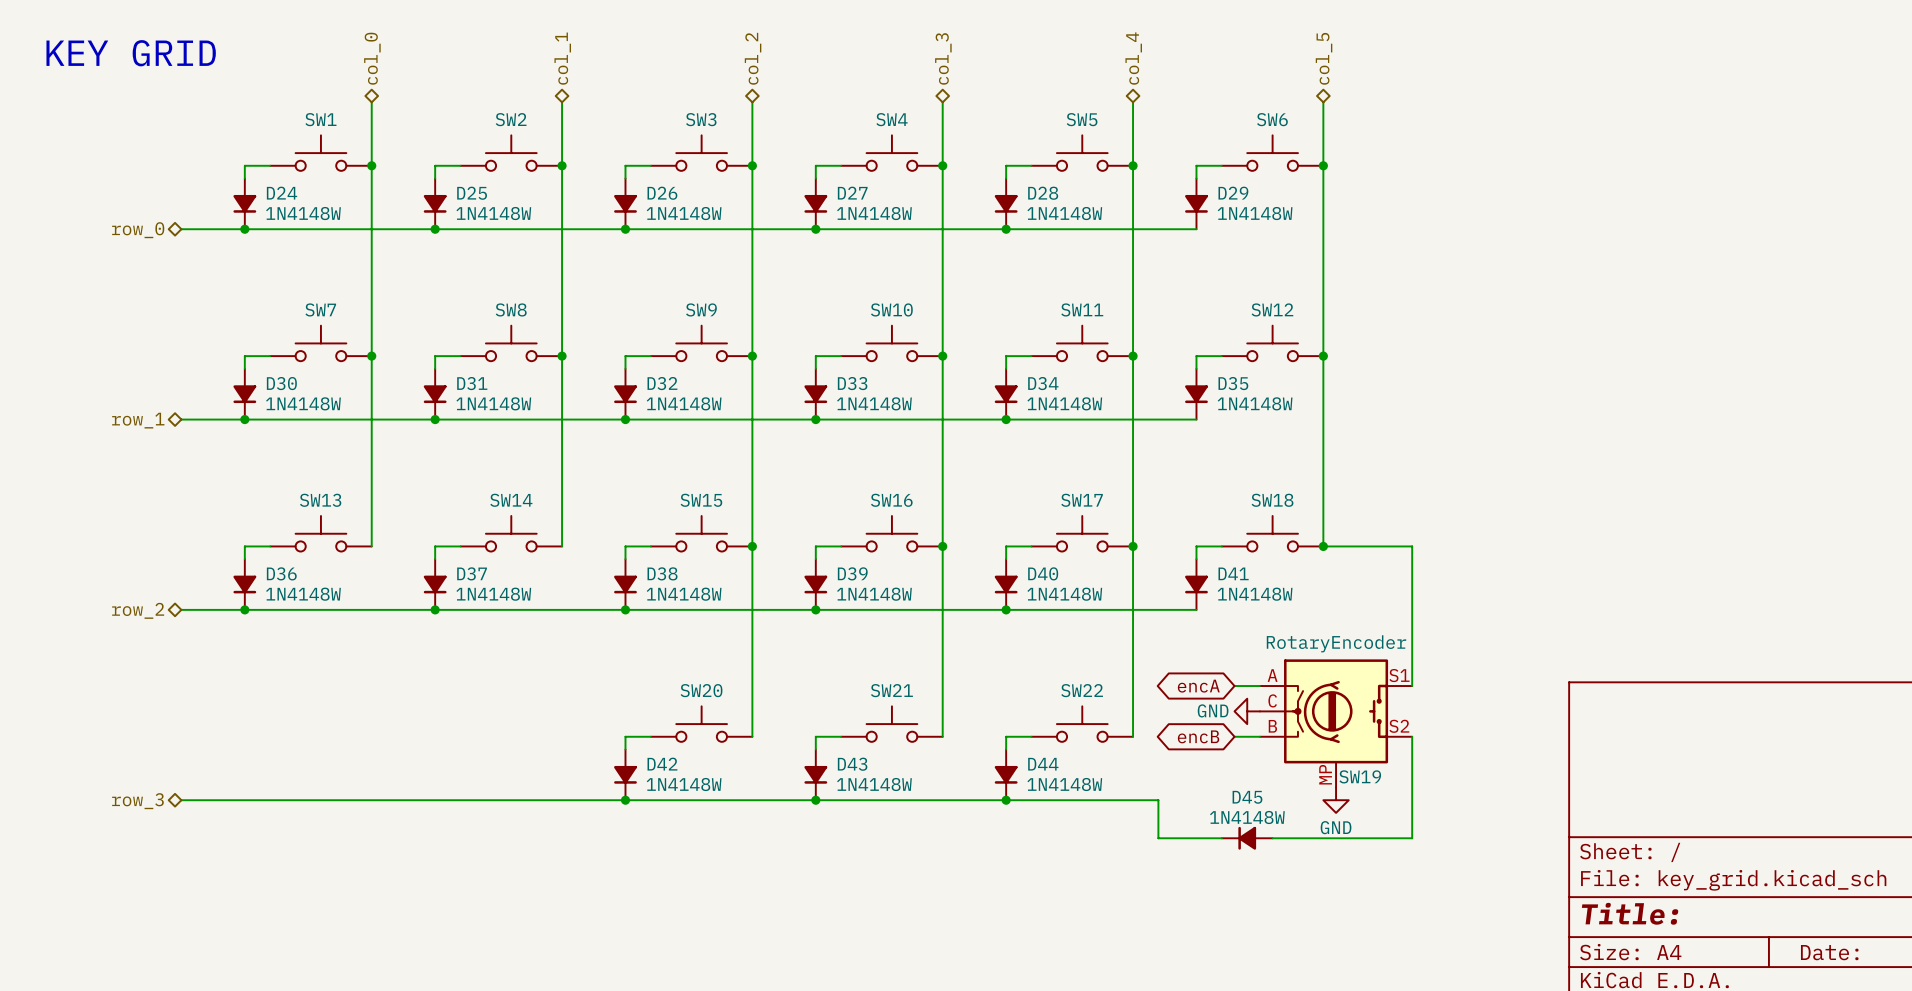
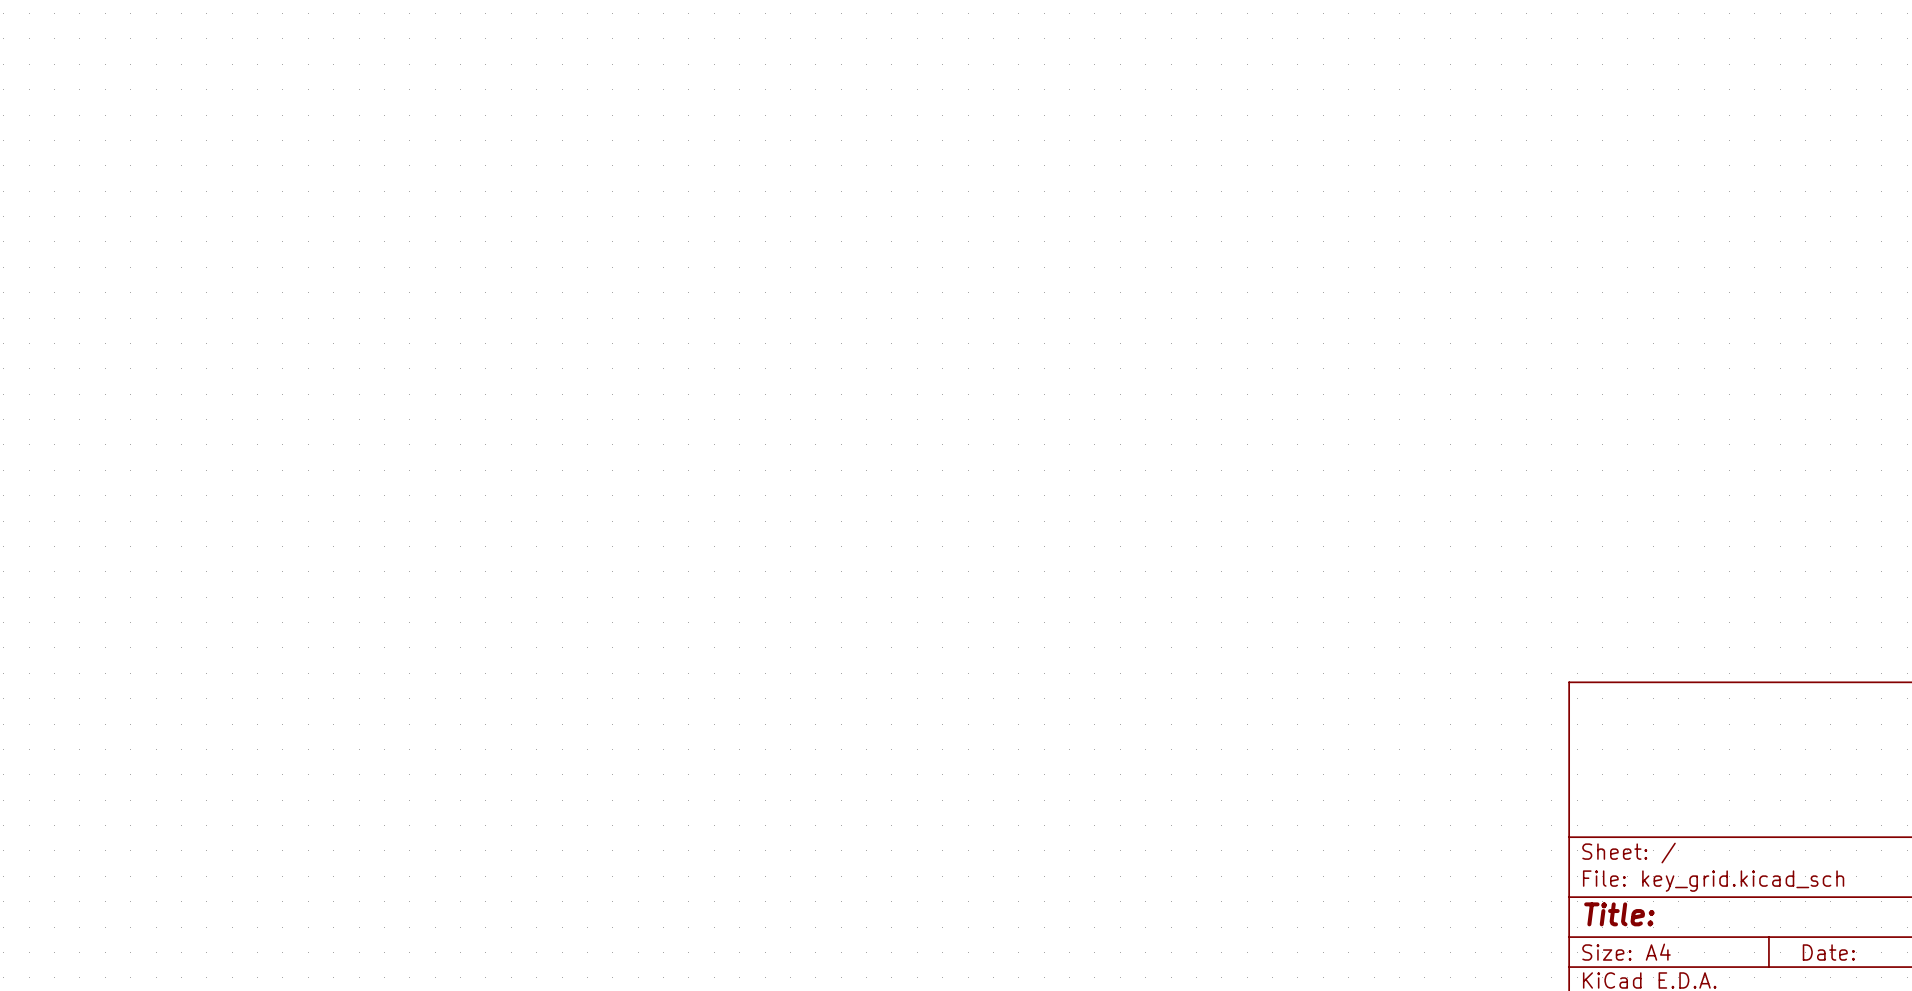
text: KEY GRID (131, 53) -> none
hierarchical label: col_0 (372, 58) -> none
hierarchical label: col_1 (562, 58) -> none
hierarchical label: col_2 (753, 58) -> none
hierarchical label: col_3 (943, 58) -> none
hierarchical label: col_4 (1133, 58) -> none
hierarchical label: col_5 (1324, 58) -> none
wire: (371, 102) (371, 546) -> none
wire: (562, 102) (562, 546) -> none
wire: (752, 102) (752, 736) -> none
wire: (942, 102) (942, 736) -> none
wire: (1133, 102) (1133, 736) -> none
wire: (1323, 102) (1323, 546) (1412, 546) (1412, 686) -> none
SW1: (320, 153) -> none
SW2: (511, 153) -> none
SW3: (701, 153) -> none
SW4: (891, 153) -> none
SW5: (1082, 153) -> none
SW6: (1272, 153) -> none
wire: (270, 165) (244, 165) (244, 178) -> none
junction: (371, 165) -> none
wire: (460, 165) (435, 165) (435, 178) -> none
junction: (562, 165) -> none
wire: (650, 165) (625, 165) (625, 178) -> none
junction: (752, 165) -> none
wire: (841, 165) (815, 165) (815, 178) -> none
junction: (942, 165) -> none
wire: (1031, 165) (1006, 165) (1006, 178) -> none
junction: (1133, 165) -> none
wire: (1221, 165) (1196, 165) (1196, 178) -> none
junction: (1323, 165) -> none
D24: 1N4148W (244, 203) -> none
D25: 1N4148W (435, 203) -> none
D26: 1N4148W (625, 203) -> none
D27: 1N4148W (815, 203) -> none
D28: 1N4148W (1006, 203) -> none
D29: 1N4148W (1196, 203) -> none
wire: (181, 229) (1196, 229) -> none
junction: (244, 229) -> none
junction: (435, 229) -> none
junction: (625, 229) -> none
junction: (815, 229) -> none
junction: (1006, 229) -> none
hierarchical label: row_0 (138, 230) -> none
SW7: (320, 343) -> none
SW8: (511, 343) -> none
SW9: (701, 343) -> none
SW10: (891, 343) -> none
SW11: (1082, 343) -> none
SW12: (1272, 343) -> none
wire: (270, 356) (244, 356) (244, 368) -> none
junction: (371, 356) -> none
wire: (460, 356) (435, 356) (435, 368) -> none
junction: (562, 356) -> none
wire: (650, 356) (625, 356) (625, 368) -> none
junction: (752, 356) -> none
wire: (841, 356) (815, 356) (815, 368) -> none
junction: (942, 356) -> none
wire: (1031, 356) (1006, 356) (1006, 368) -> none
junction: (1133, 356) -> none
wire: (1221, 356) (1196, 356) (1196, 368) -> none
junction: (1323, 356) -> none
D30: 1N4148W (244, 394) -> none
D31: 1N4148W (435, 394) -> none
D32: 1N4148W (625, 394) -> none
D33: 1N4148W (815, 394) -> none
D34: 1N4148W (1006, 394) -> none
D35: 1N4148W (1196, 394) -> none
wire: (181, 419) (1196, 419) -> none
junction: (244, 419) -> none
junction: (435, 419) -> none
junction: (625, 419) -> none
junction: (815, 419) -> none
junction: (1006, 419) -> none
hierarchical label: row_1 (138, 420) -> none
SW13: (320, 533) -> none
SW14: (511, 533) -> none
SW15: (701, 533) -> none
SW16: (891, 533) -> none
SW17: (1082, 533) -> none
SW18: (1272, 533) -> none
wire: (270, 546) (244, 546) (244, 559) -> none
wire: (460, 546) (435, 546) (435, 559) -> none
wire: (650, 546) (625, 546) (625, 559) -> none
junction: (752, 546) -> none
wire: (841, 546) (815, 546) (815, 559) -> none
junction: (942, 546) -> none
wire: (1031, 546) (1006, 546) (1006, 559) -> none
junction: (1133, 546) -> none
wire: (1221, 546) (1196, 546) (1196, 559) -> none
junction: (1323, 546) -> none
D36: 1N4148W (244, 584) -> none
D37: 1N4148W (435, 584) -> none
D38: 1N4148W (625, 584) -> none
D39: 1N4148W (815, 584) -> none
D40: 1N4148W (1006, 584) -> none
D41: 1N4148W (1196, 584) -> none
wire: (181, 609) (1196, 609) -> none
junction: (244, 609) -> none
junction: (435, 609) -> none
junction: (625, 609) -> none
junction: (815, 609) -> none
junction: (1006, 609) -> none
hierarchical label: row_2 (138, 610) -> none
global label: encA (1198, 686) -> none
wire: (1234, 686) (1259, 686) -> none
power symbol: GND (1247, 711) -> none
SW19: RotaryEncoder (1336, 723) -> none
SW20: (701, 724) -> none
SW21: (891, 724) -> none
SW22: (1082, 724) -> none
wire: (650, 736) (625, 736) (625, 749) -> none
wire: (841, 736) (815, 736) (815, 749) -> none
wire: (1031, 736) (1006, 736) (1006, 749) -> none
global label: encB (1198, 736) -> none
wire: (1234, 736) (1259, 736) -> none
wire: (1412, 736) (1412, 838) (1272, 838) -> none
D42: 1N4148W (625, 774) -> none
D43: 1N4148W (815, 774) -> none
D44: 1N4148W (1006, 774) -> none
wire: (181, 800) (1158, 800) (1158, 838) (1221, 838) -> none
junction: (625, 800) -> none
junction: (815, 800) -> none
junction: (1006, 800) -> none
power symbol: GND (1336, 800) -> none
hierarchical label: row_3 (137, 801) -> none
D45: 1N4148W (1247, 838) -> none

